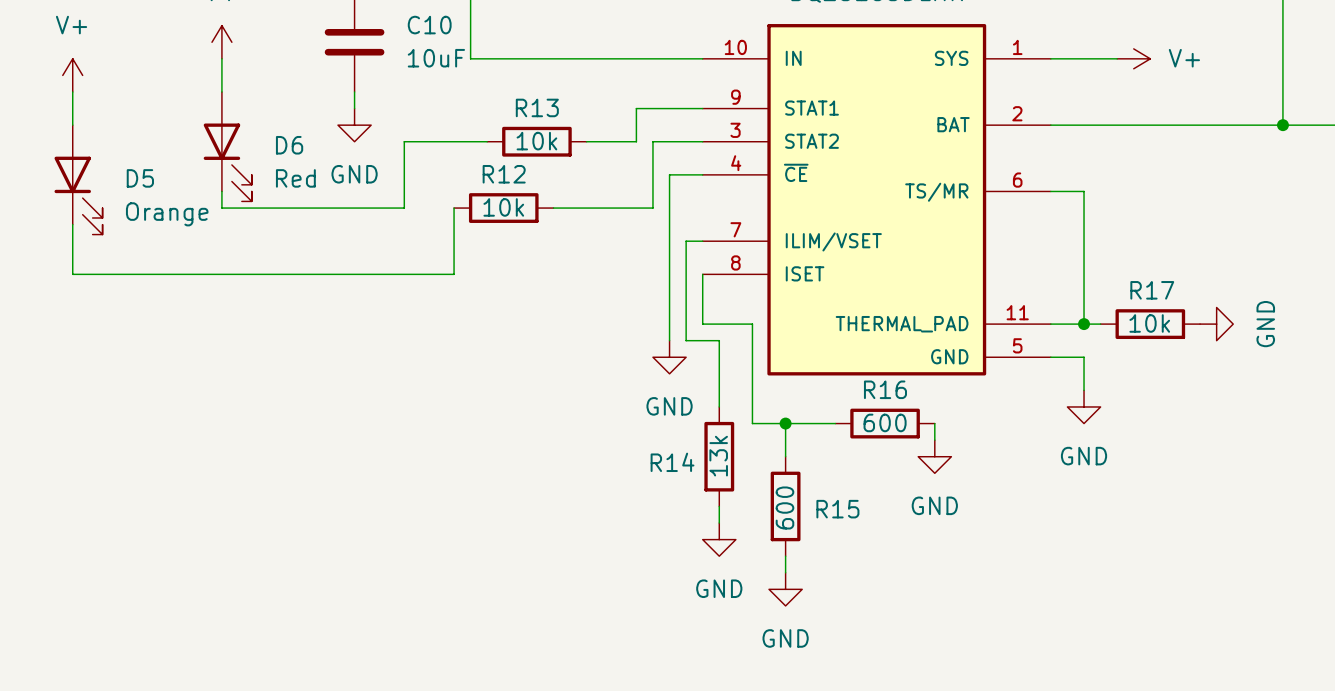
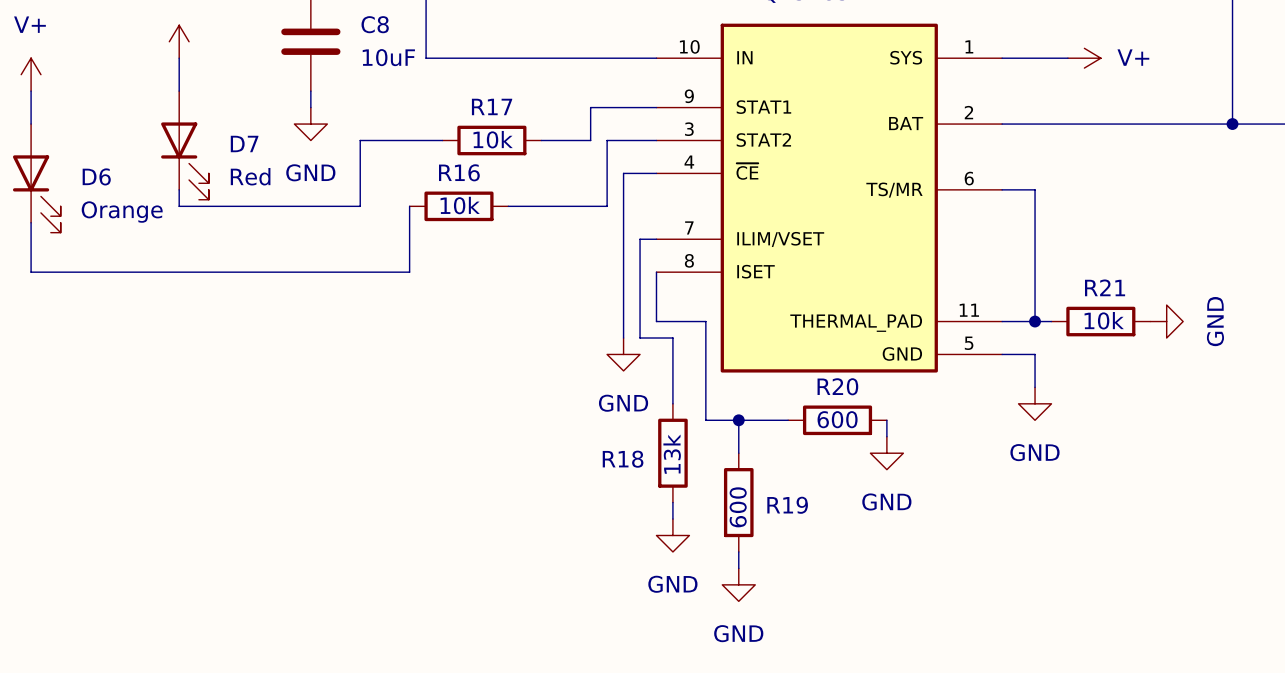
C10 name: C10 (429, 25) -> C8 (375, 24)
R13 name: R13 (537, 107) -> R17 (492, 106)
D6 name: D6 (289, 145) -> D7 (244, 144)
R12 name: R12 (504, 174) -> R16 (459, 172)
D5 name: D5 (140, 178) -> D6 (96, 176)
R17 name: R17 (1152, 290) -> R21 (1105, 287)
R16 name: R16 (885, 389) -> R20 (837, 386)
R14 name: R14 (672, 462) -> R18 (623, 459)
R15 name: R15 (837, 509) -> R19 (787, 505)

